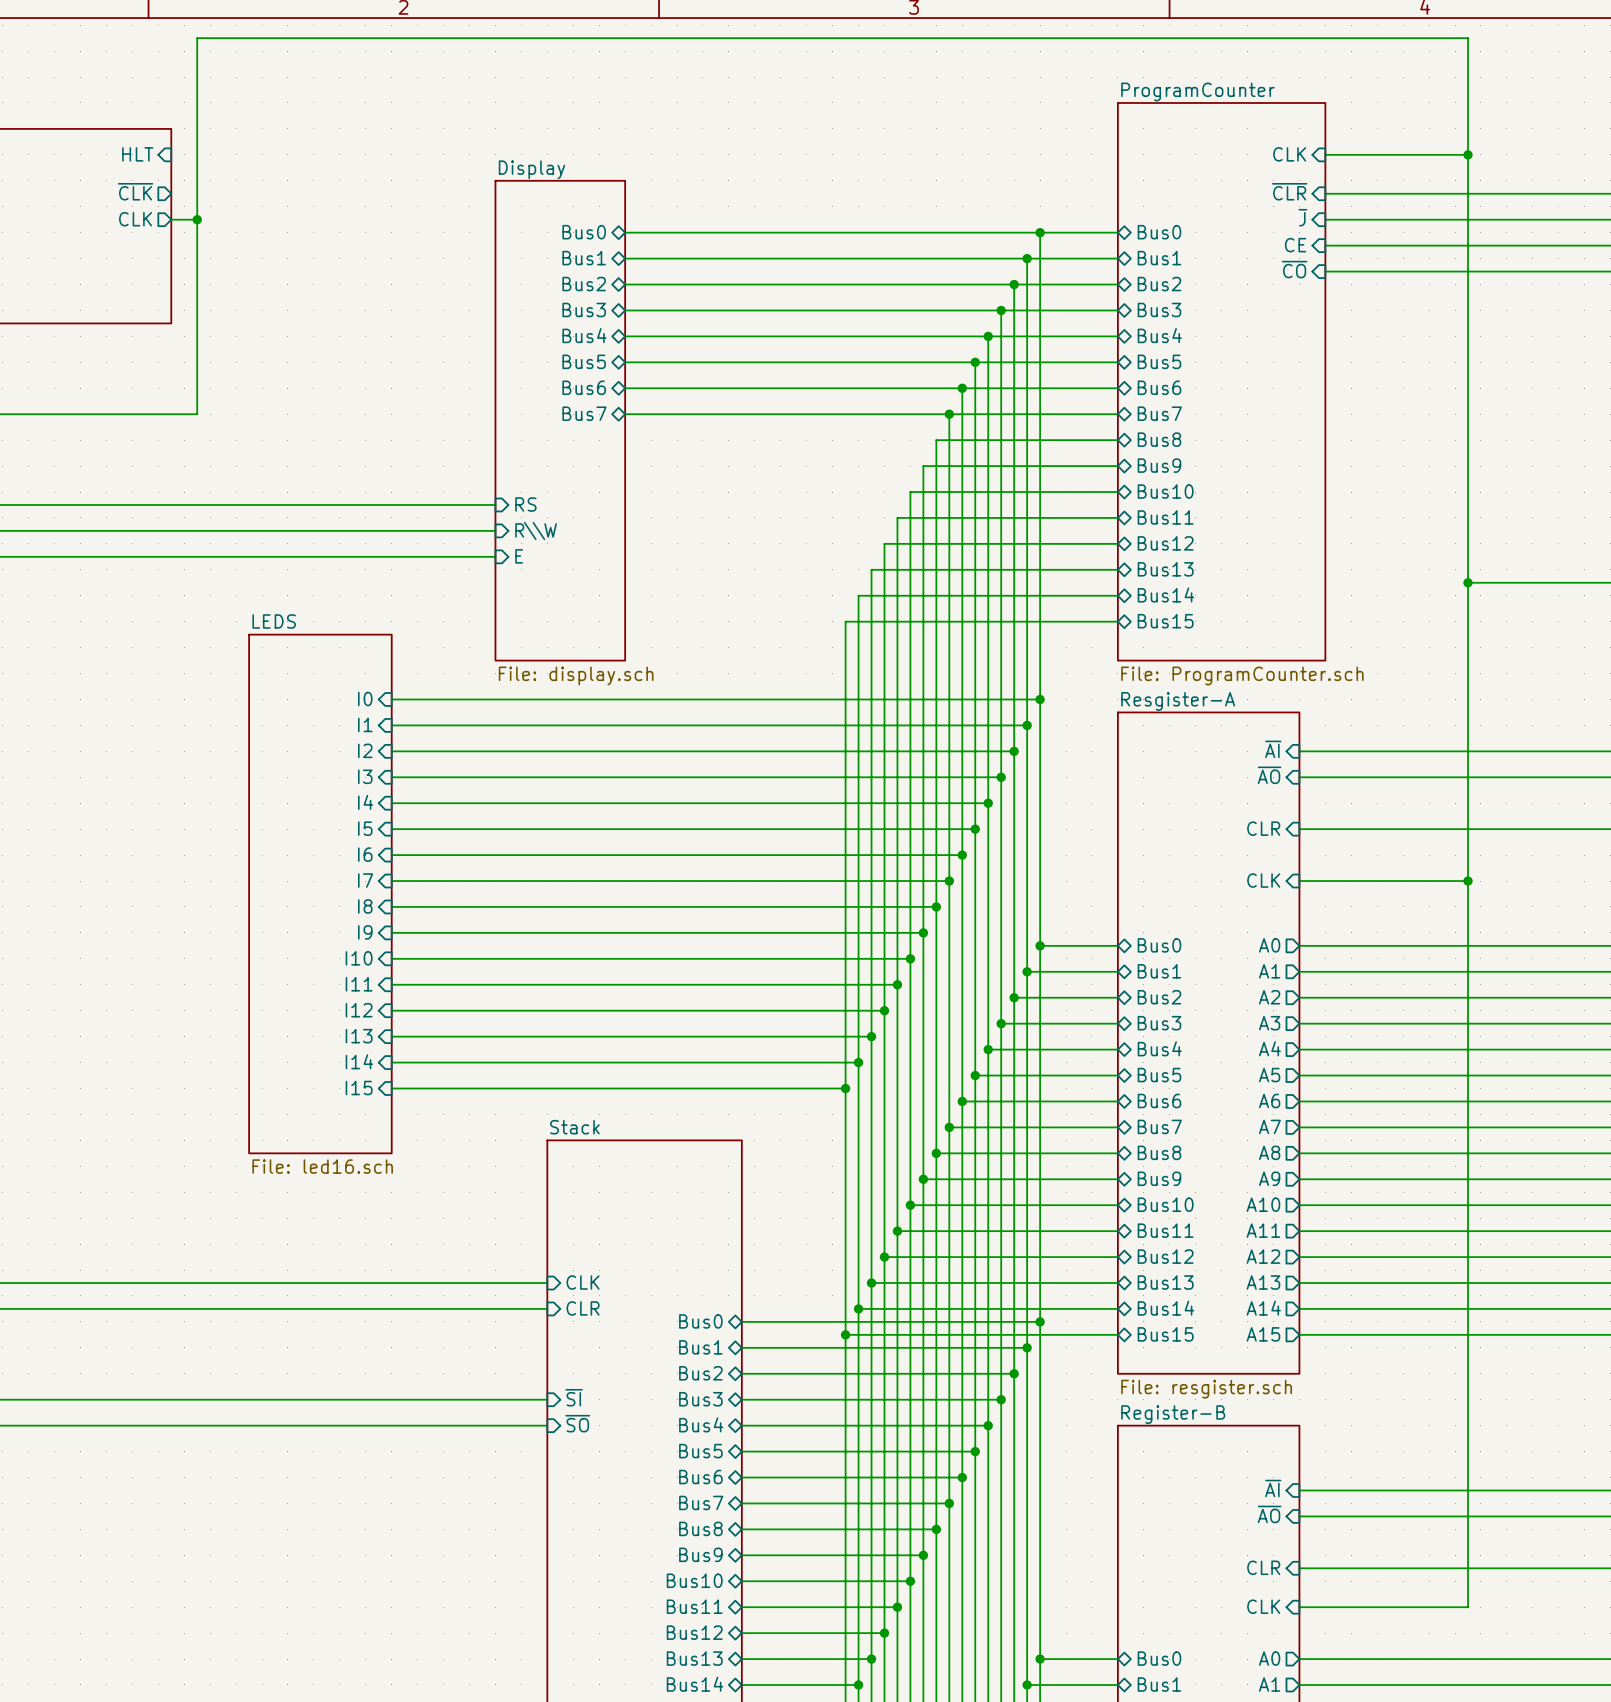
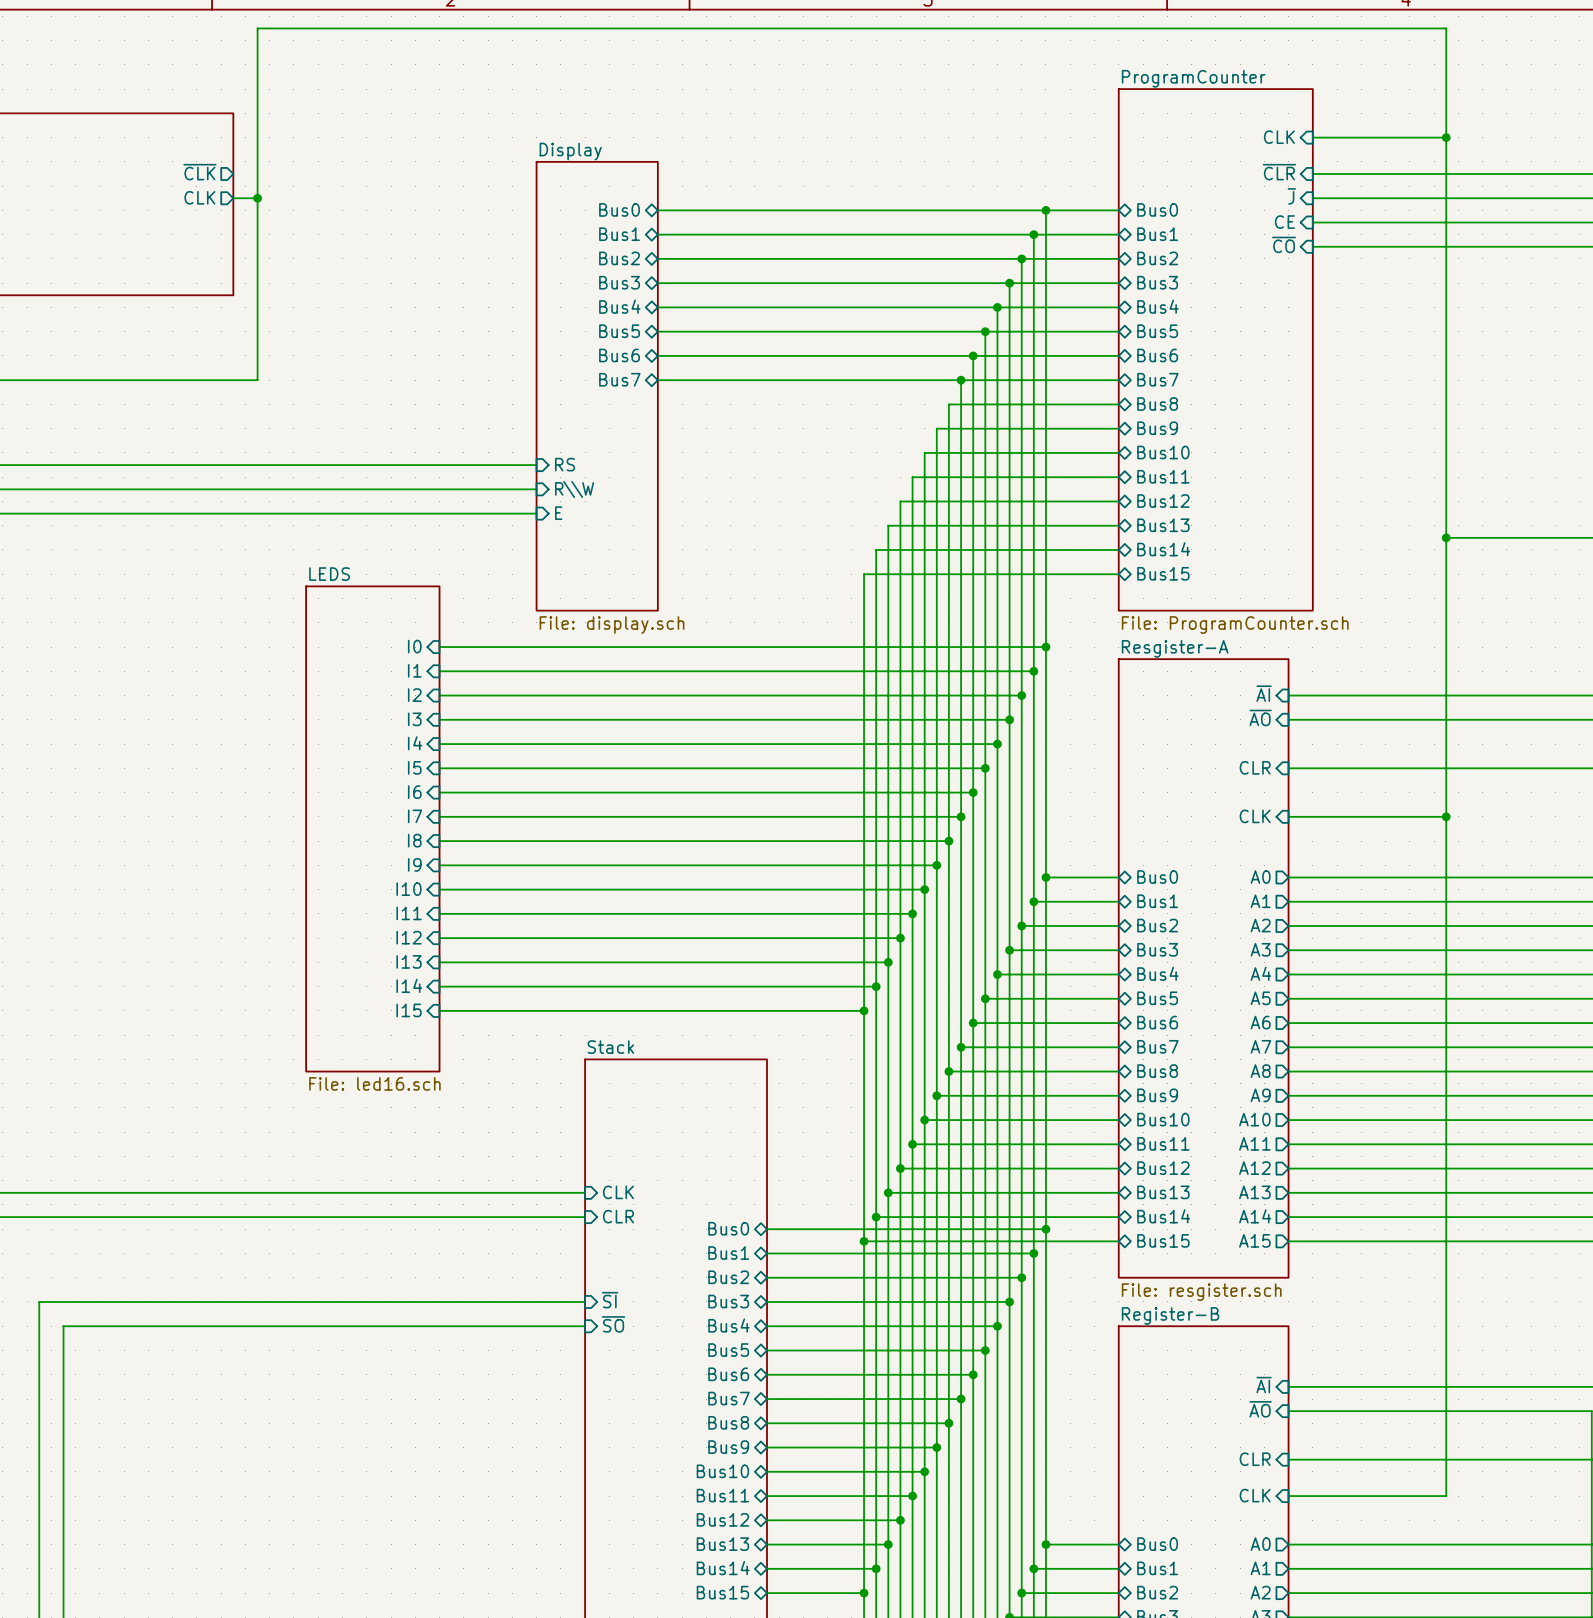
sheet pin: HLT (137, 154) -> none

